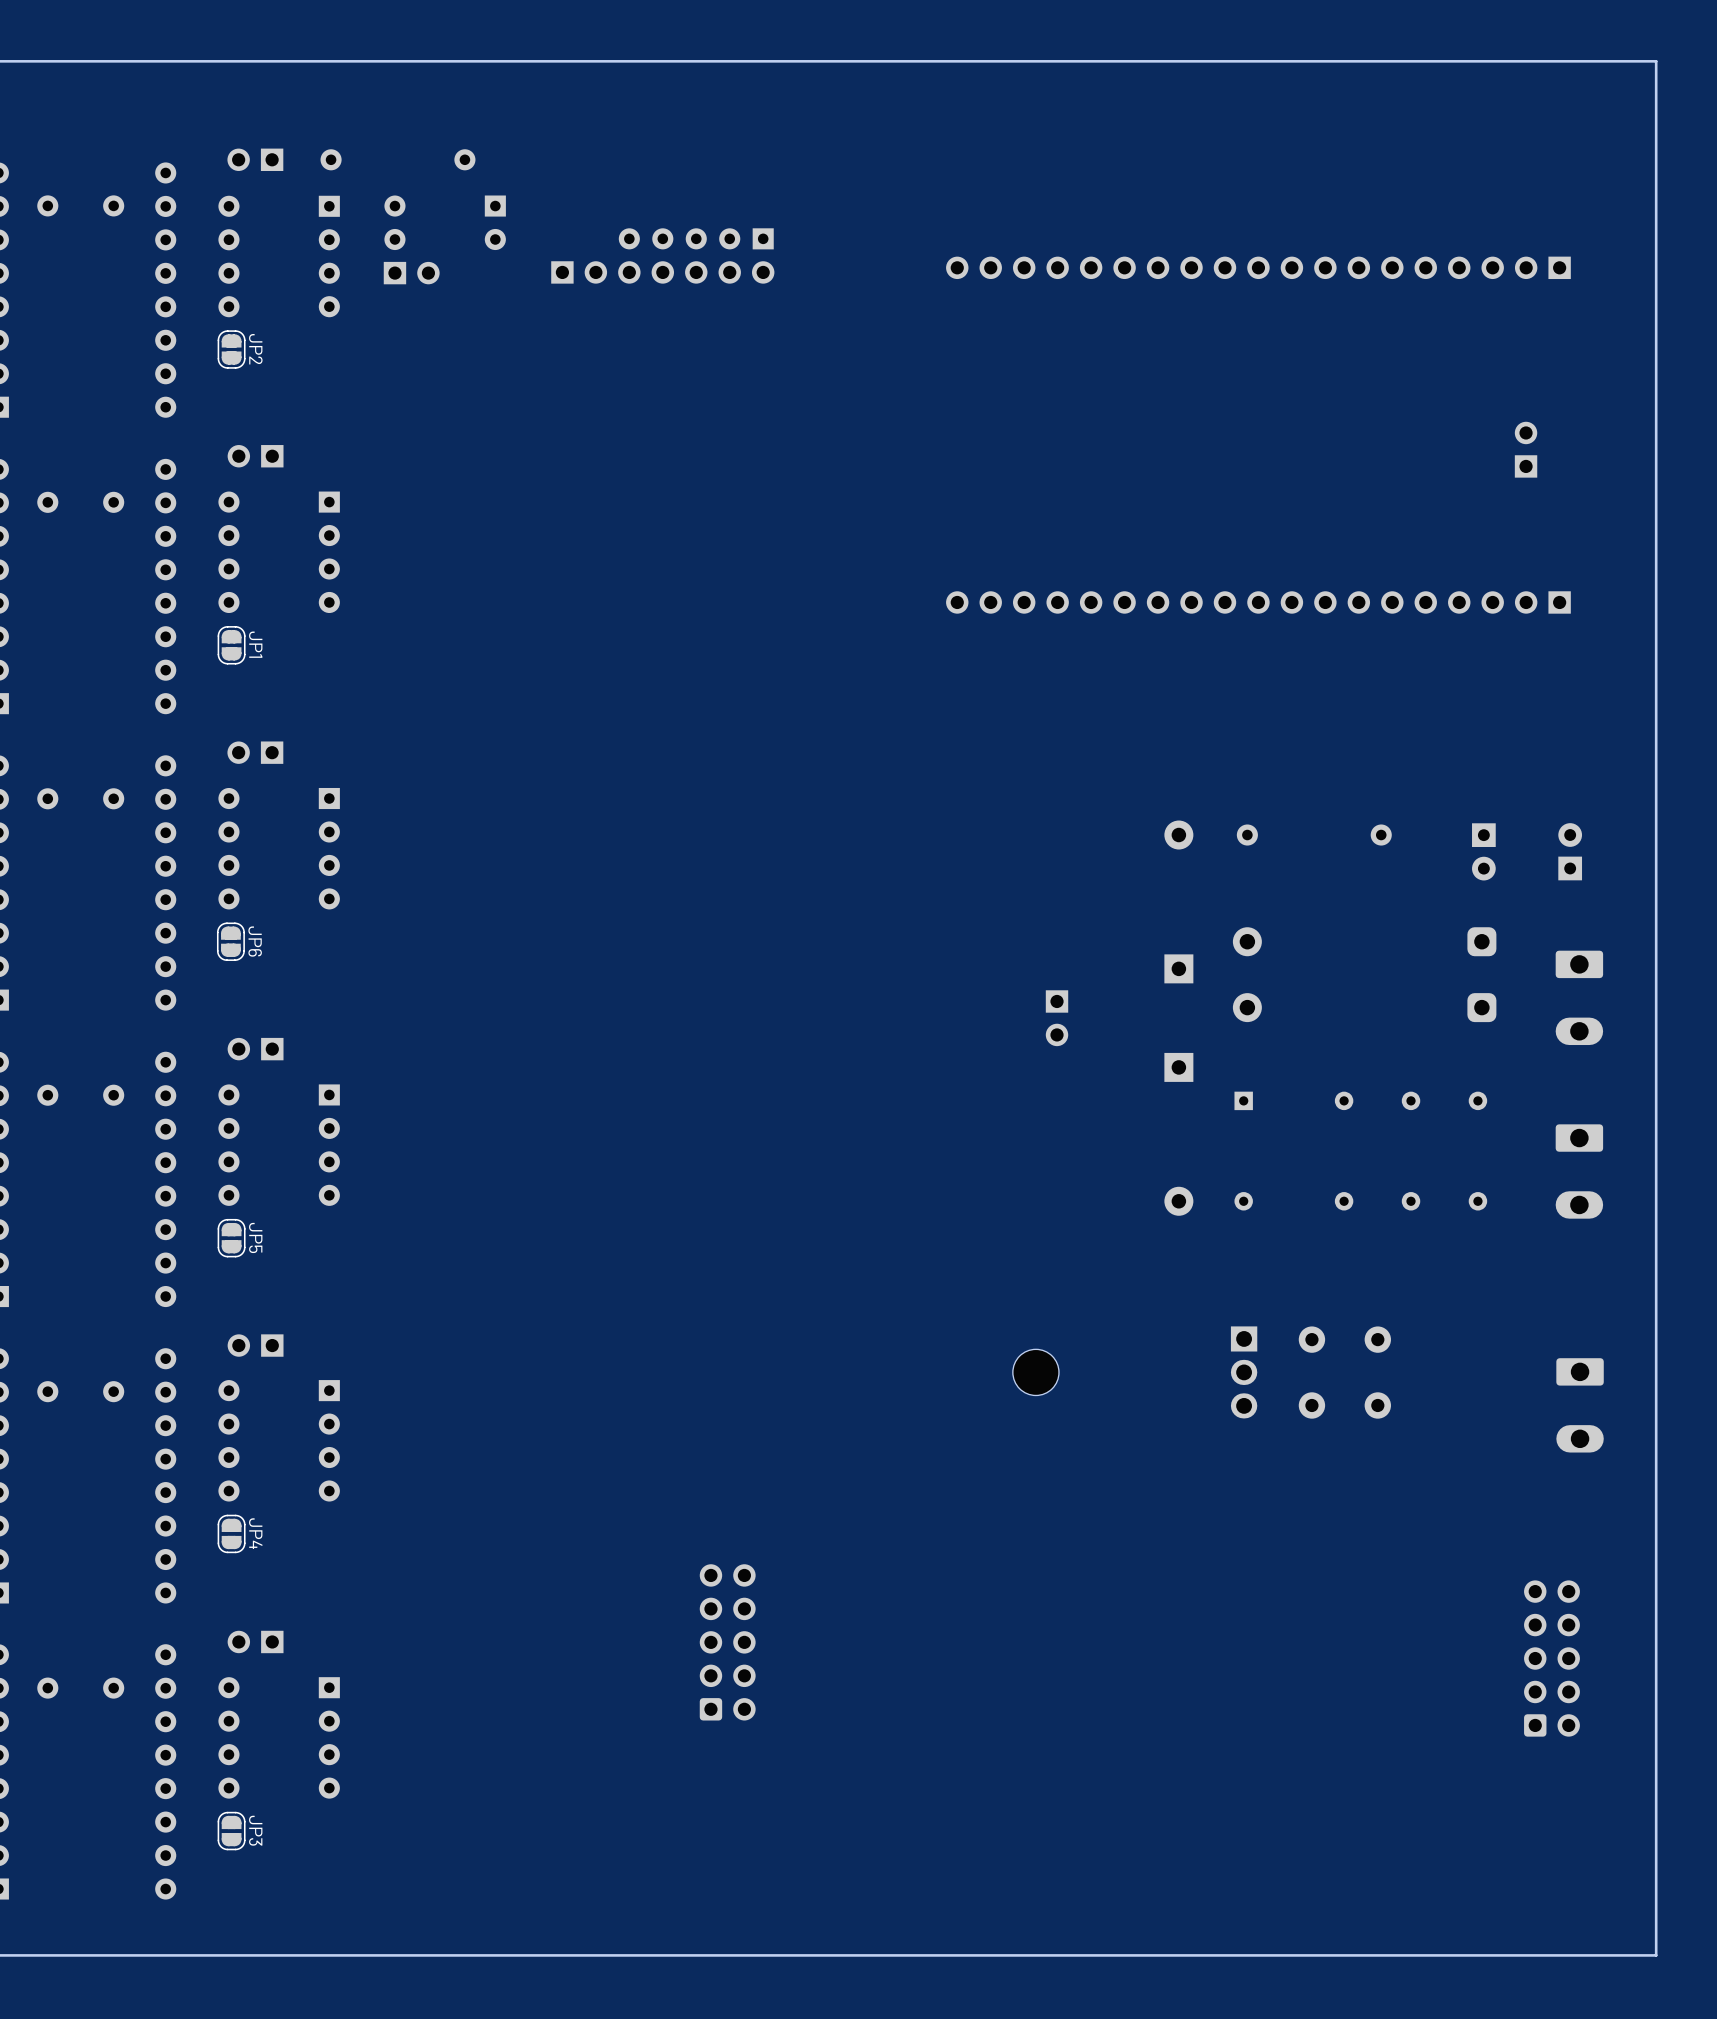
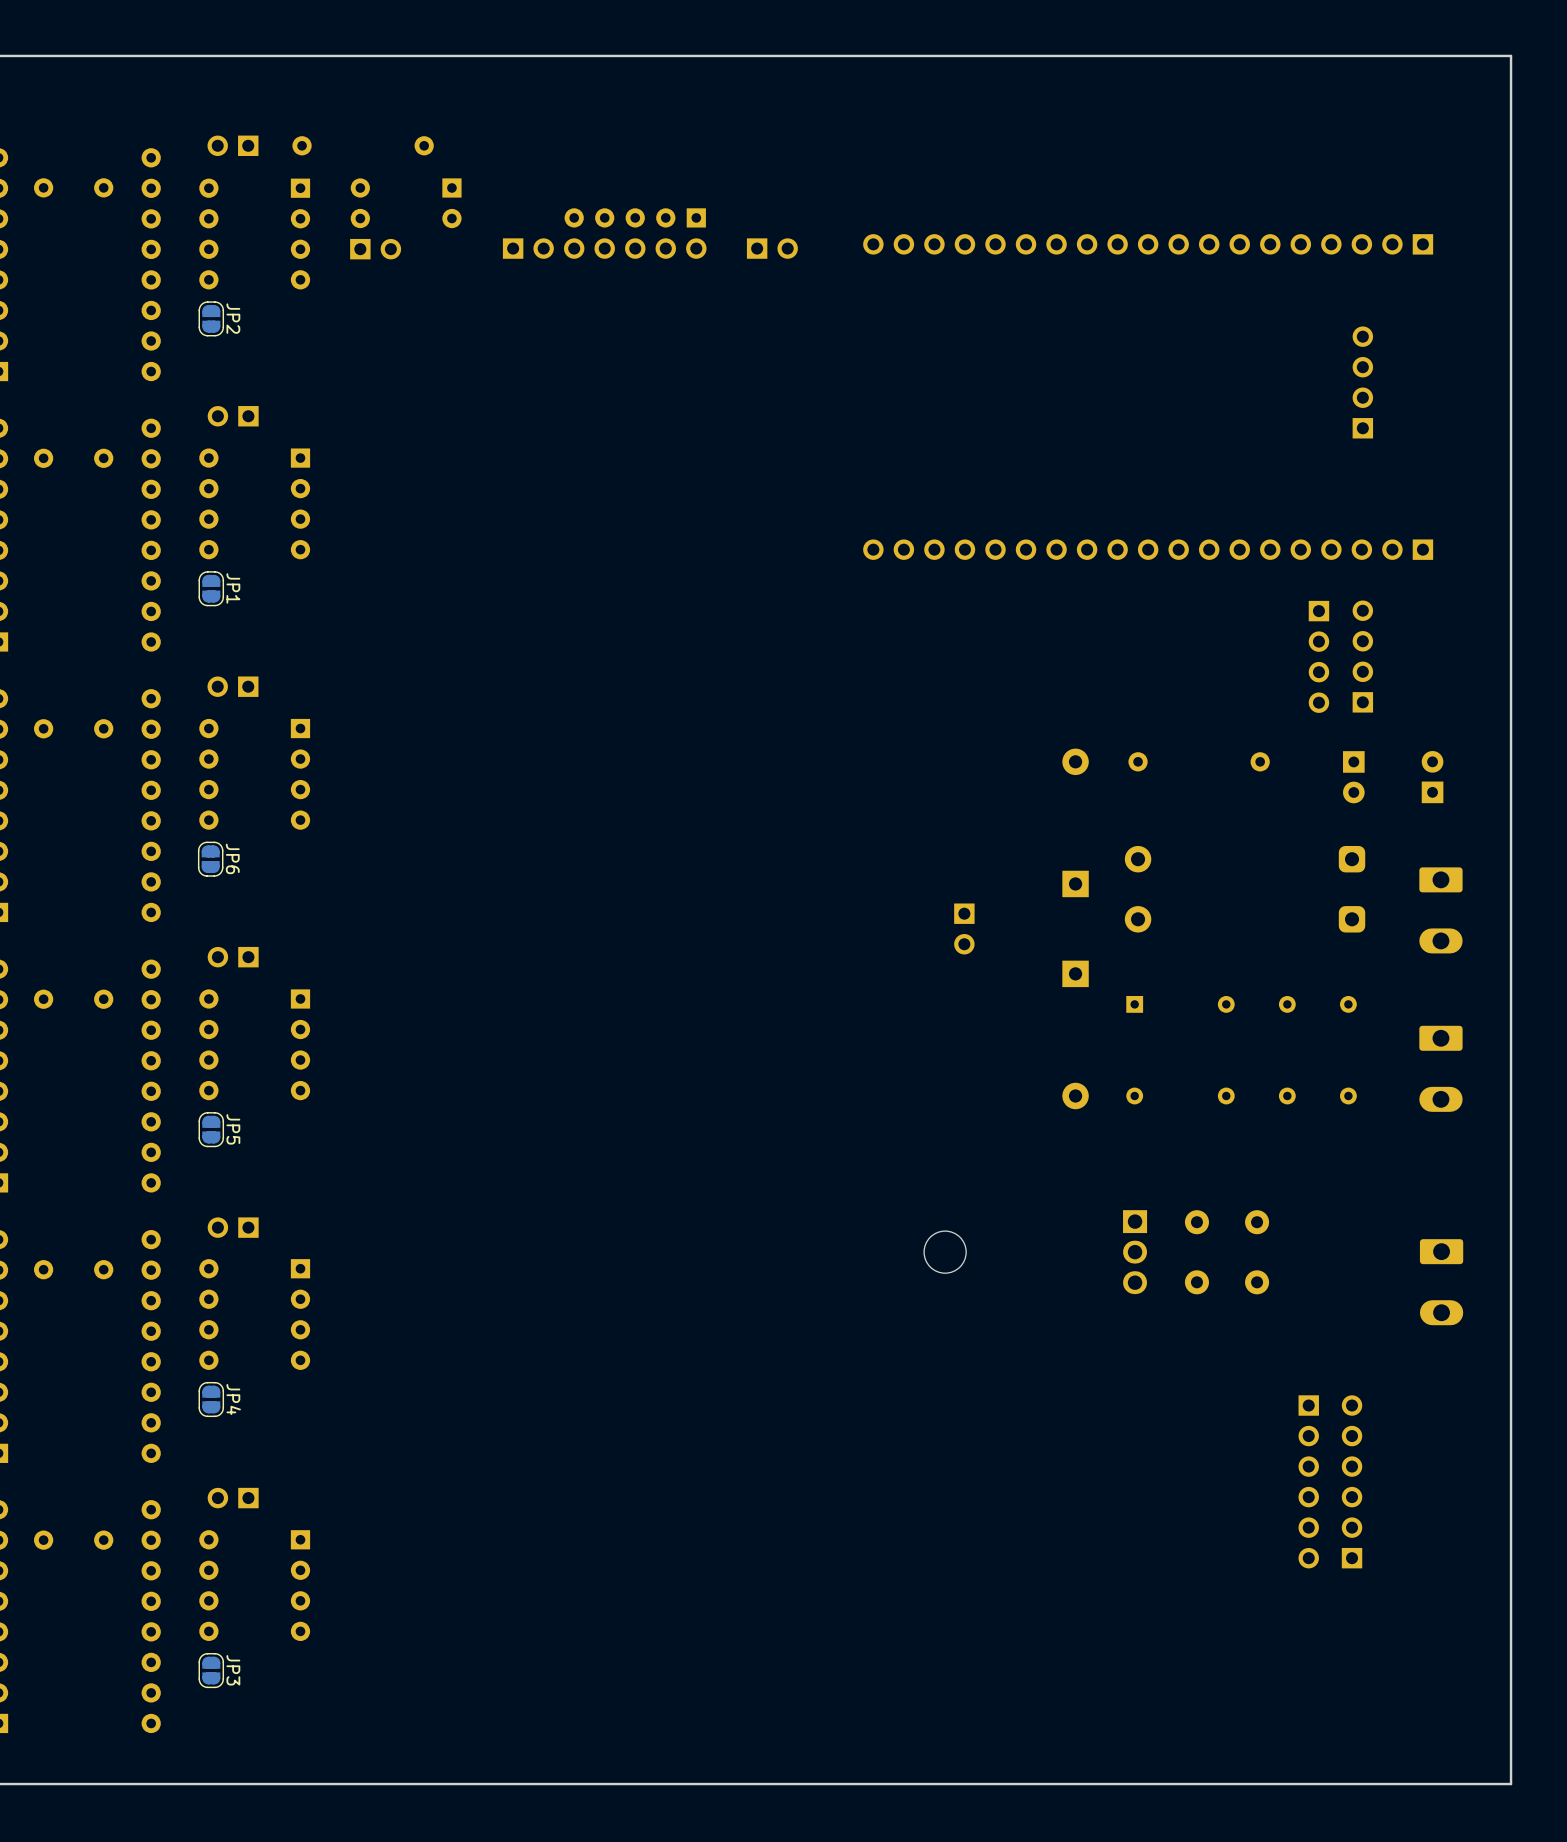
part: none -> (772, 248)
part: none -> (1362, 382)
part: (1526, 449) -> none
part: none -> (1318, 656)
part: none -> (1362, 656)
part: none -> (1308, 1481)
part: none -> (1352, 1481)
part: (727, 1642) -> none
part: (1551, 1658) -> none

